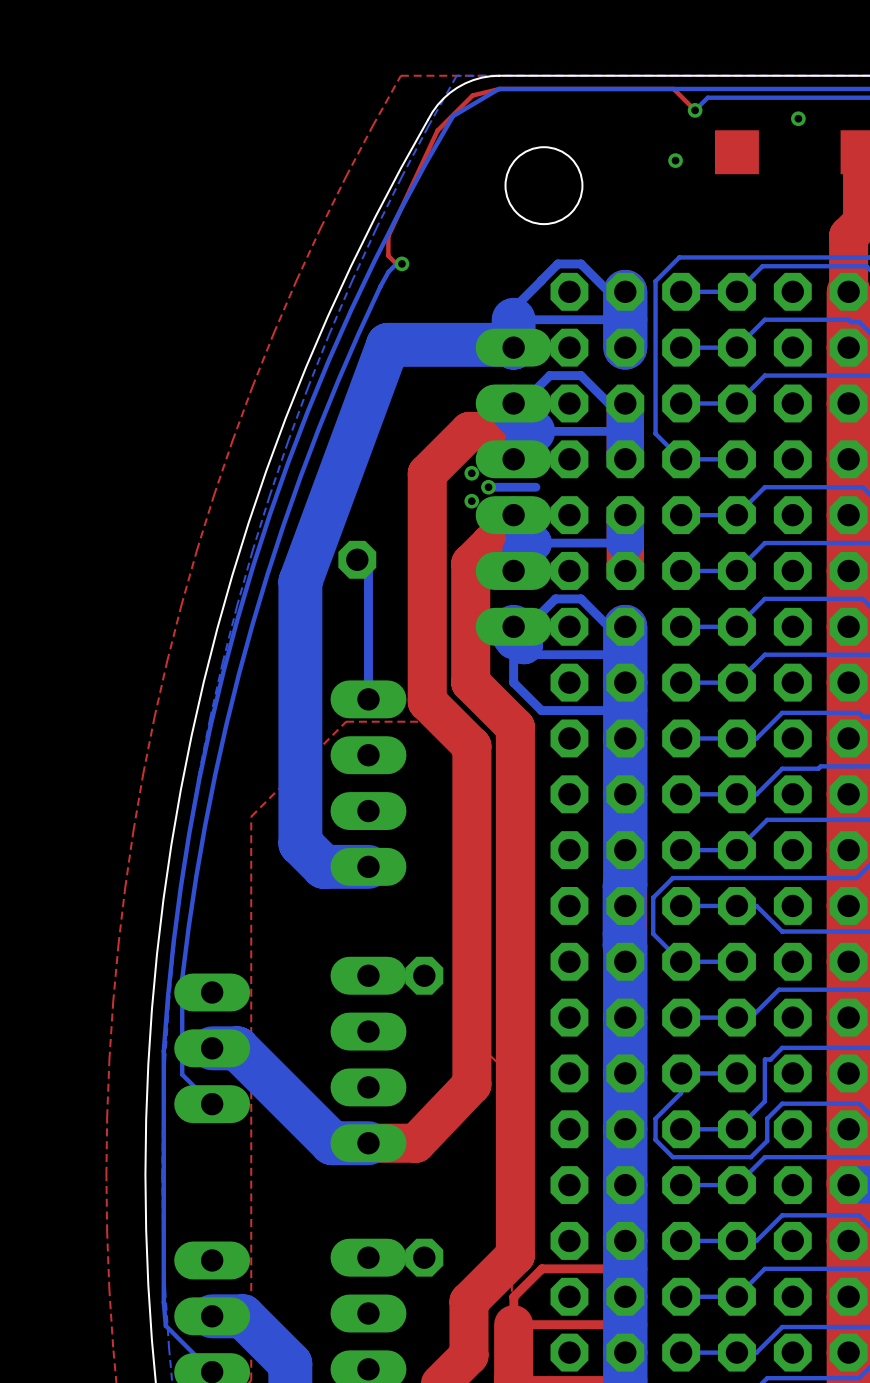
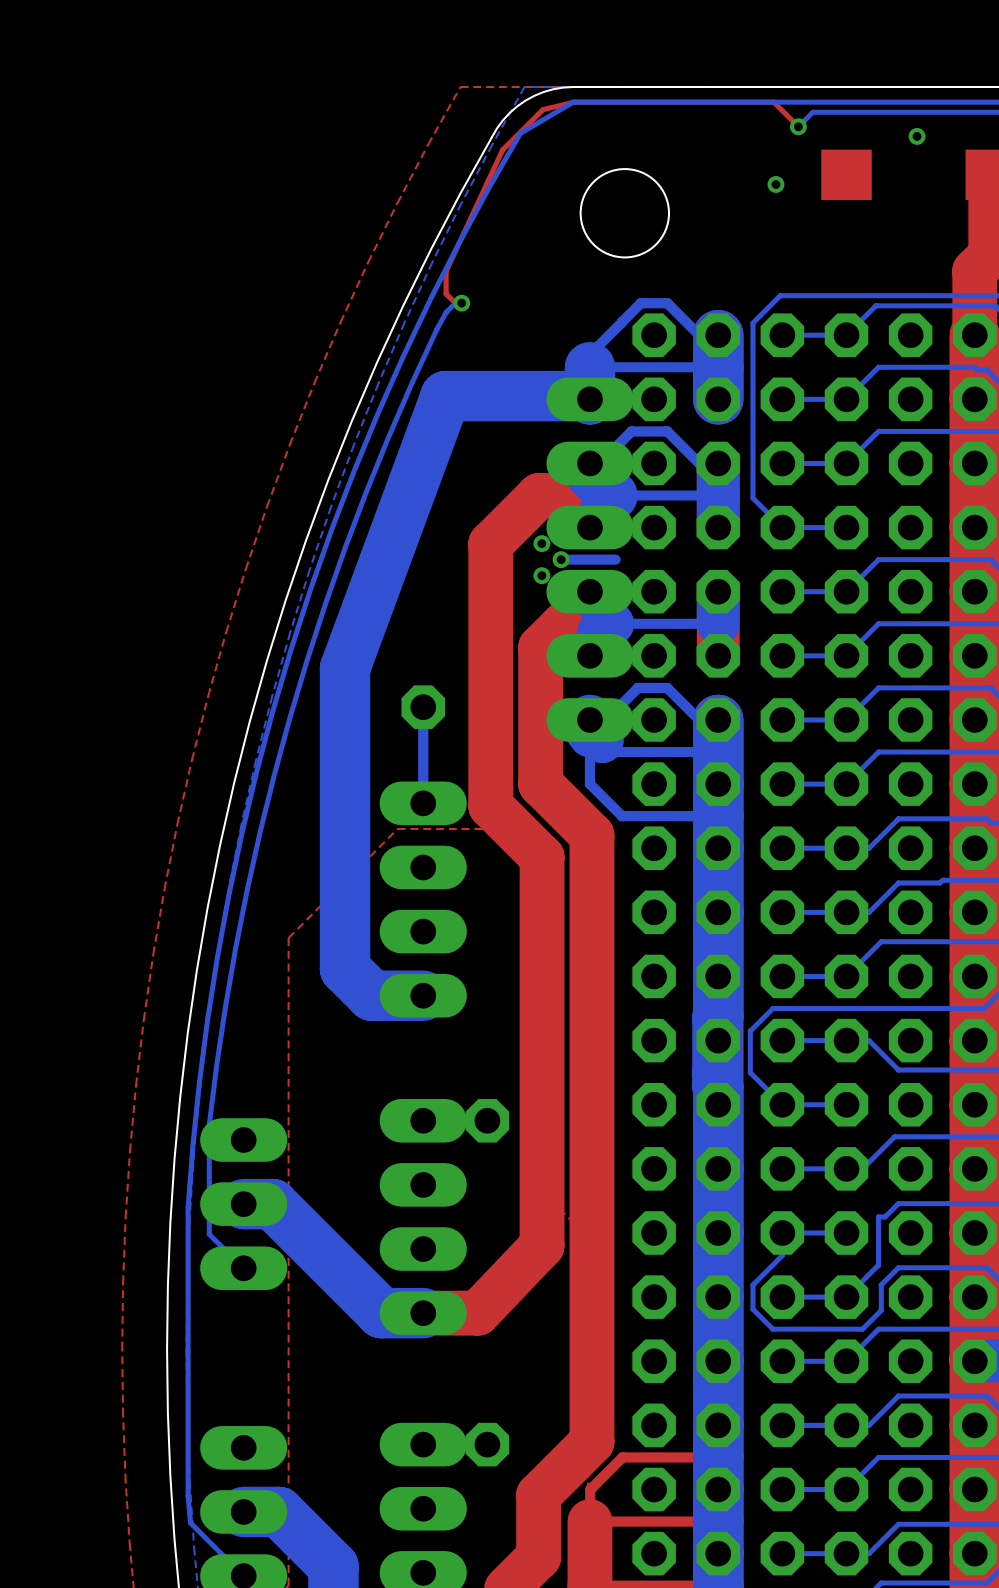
bottom track: (357, 559) (368, 570) (368, 615) -> none
part position: (357, 559) -> (423, 707)

